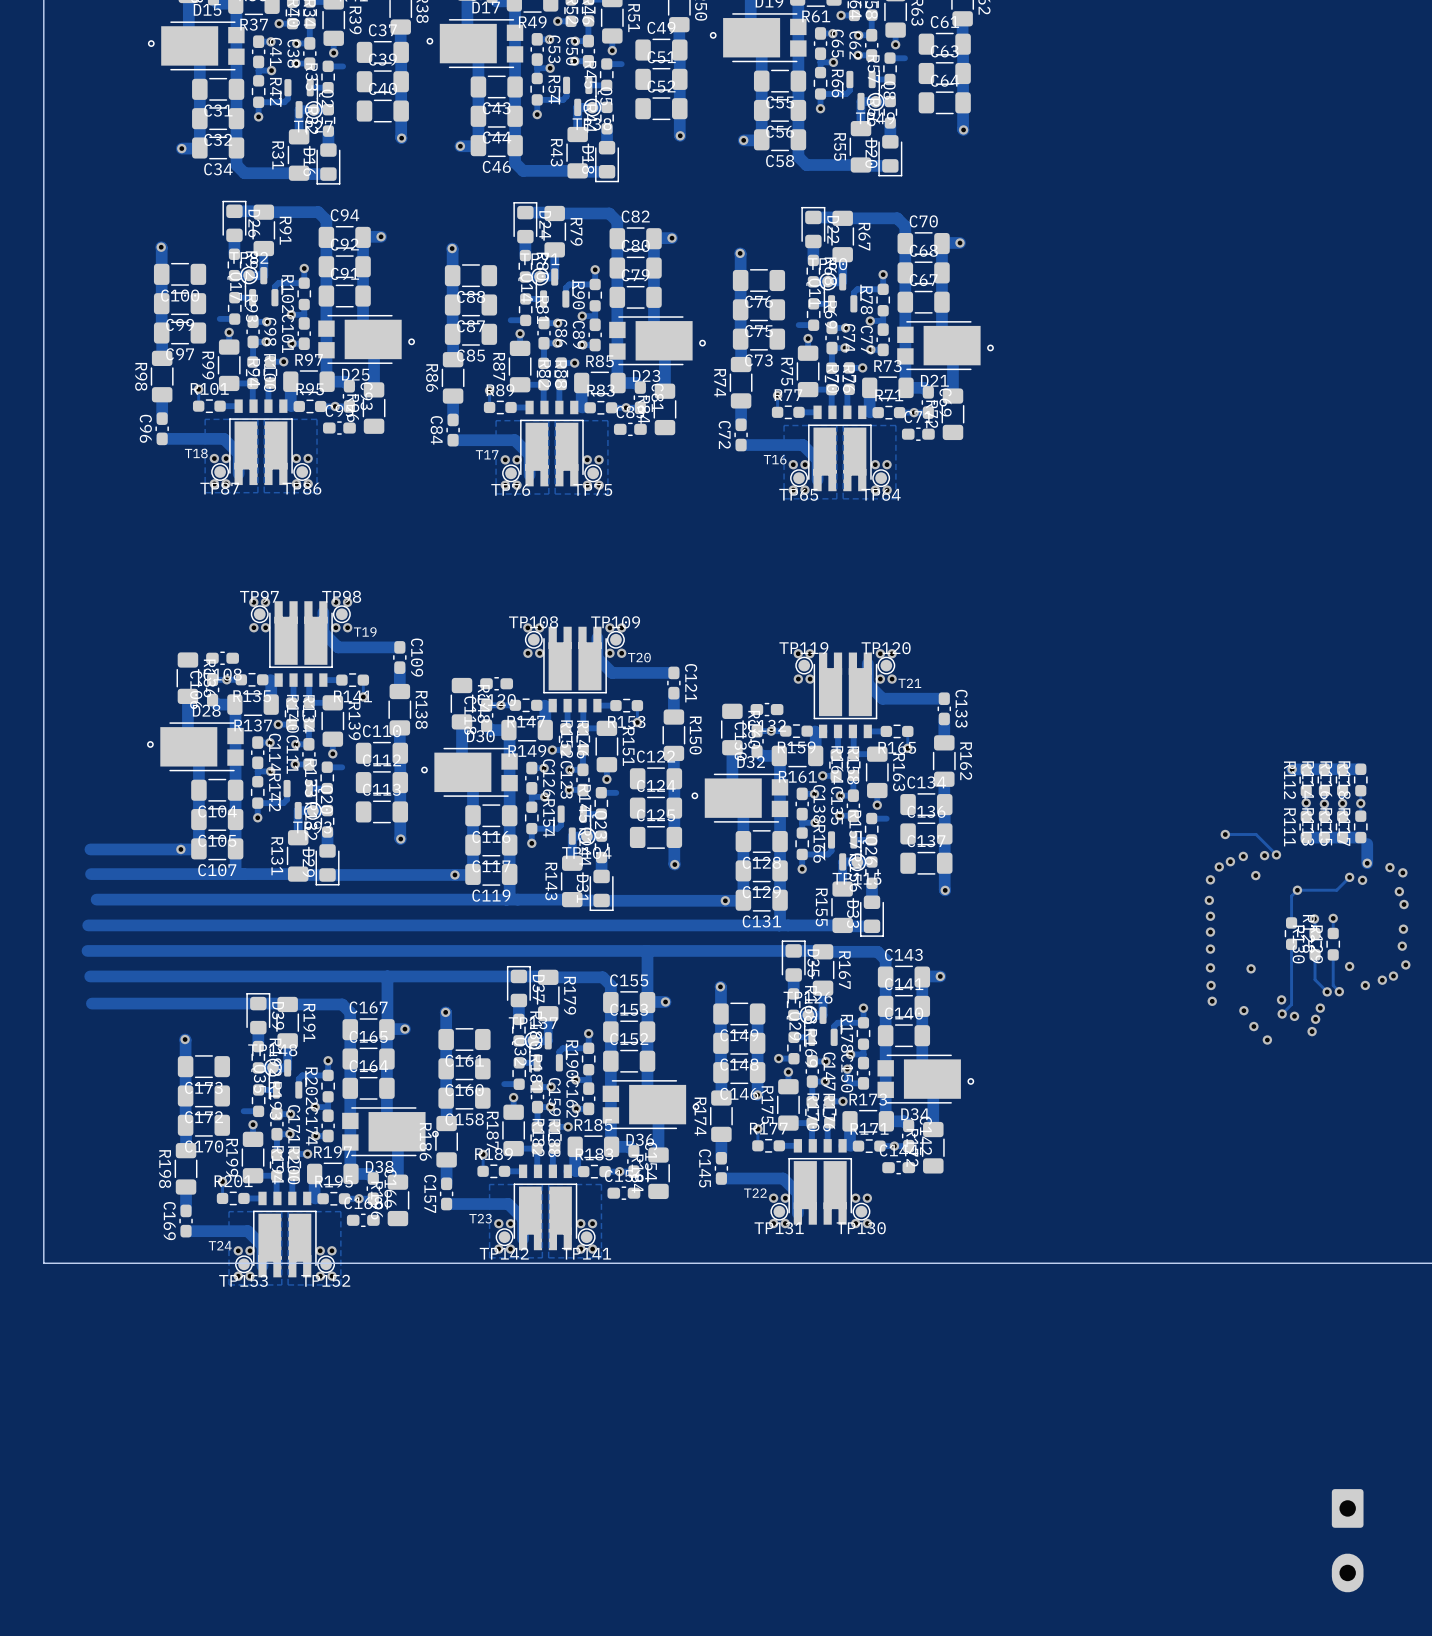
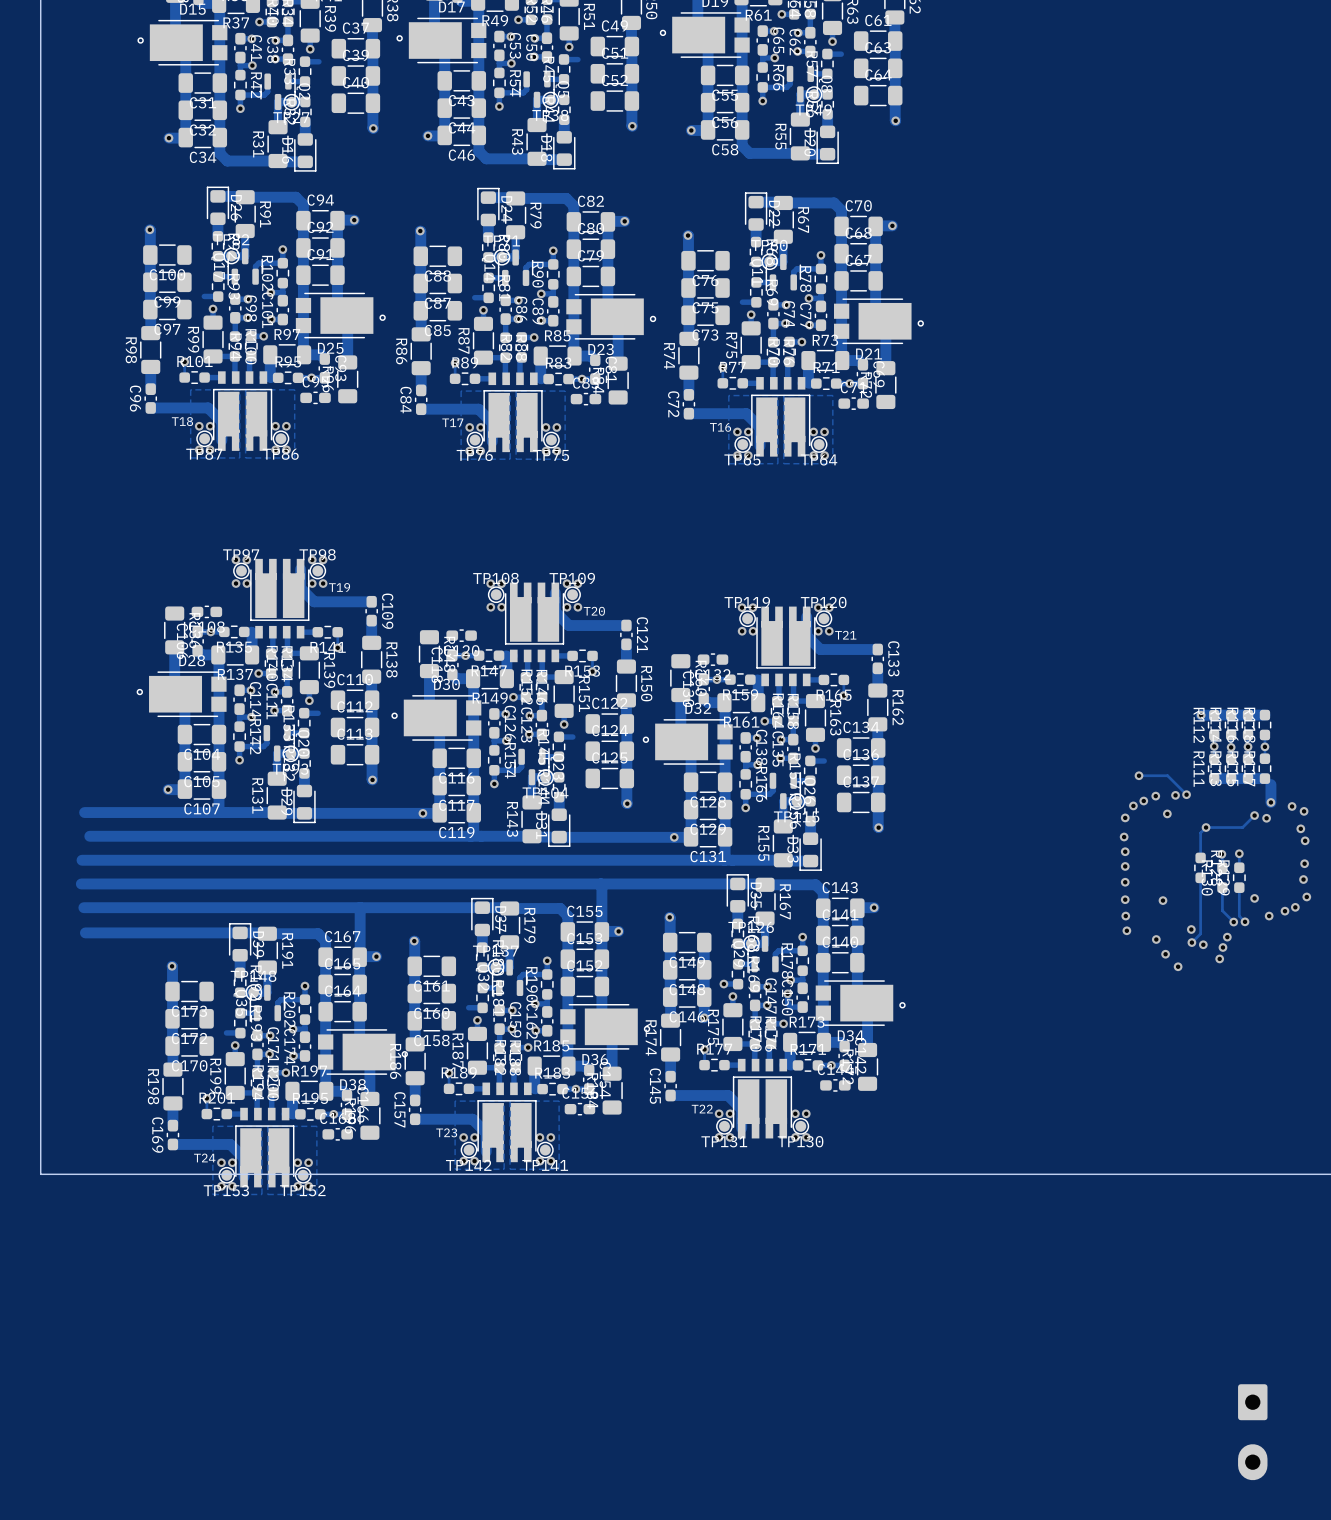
track: (180, 849) (90, 849) -> none

